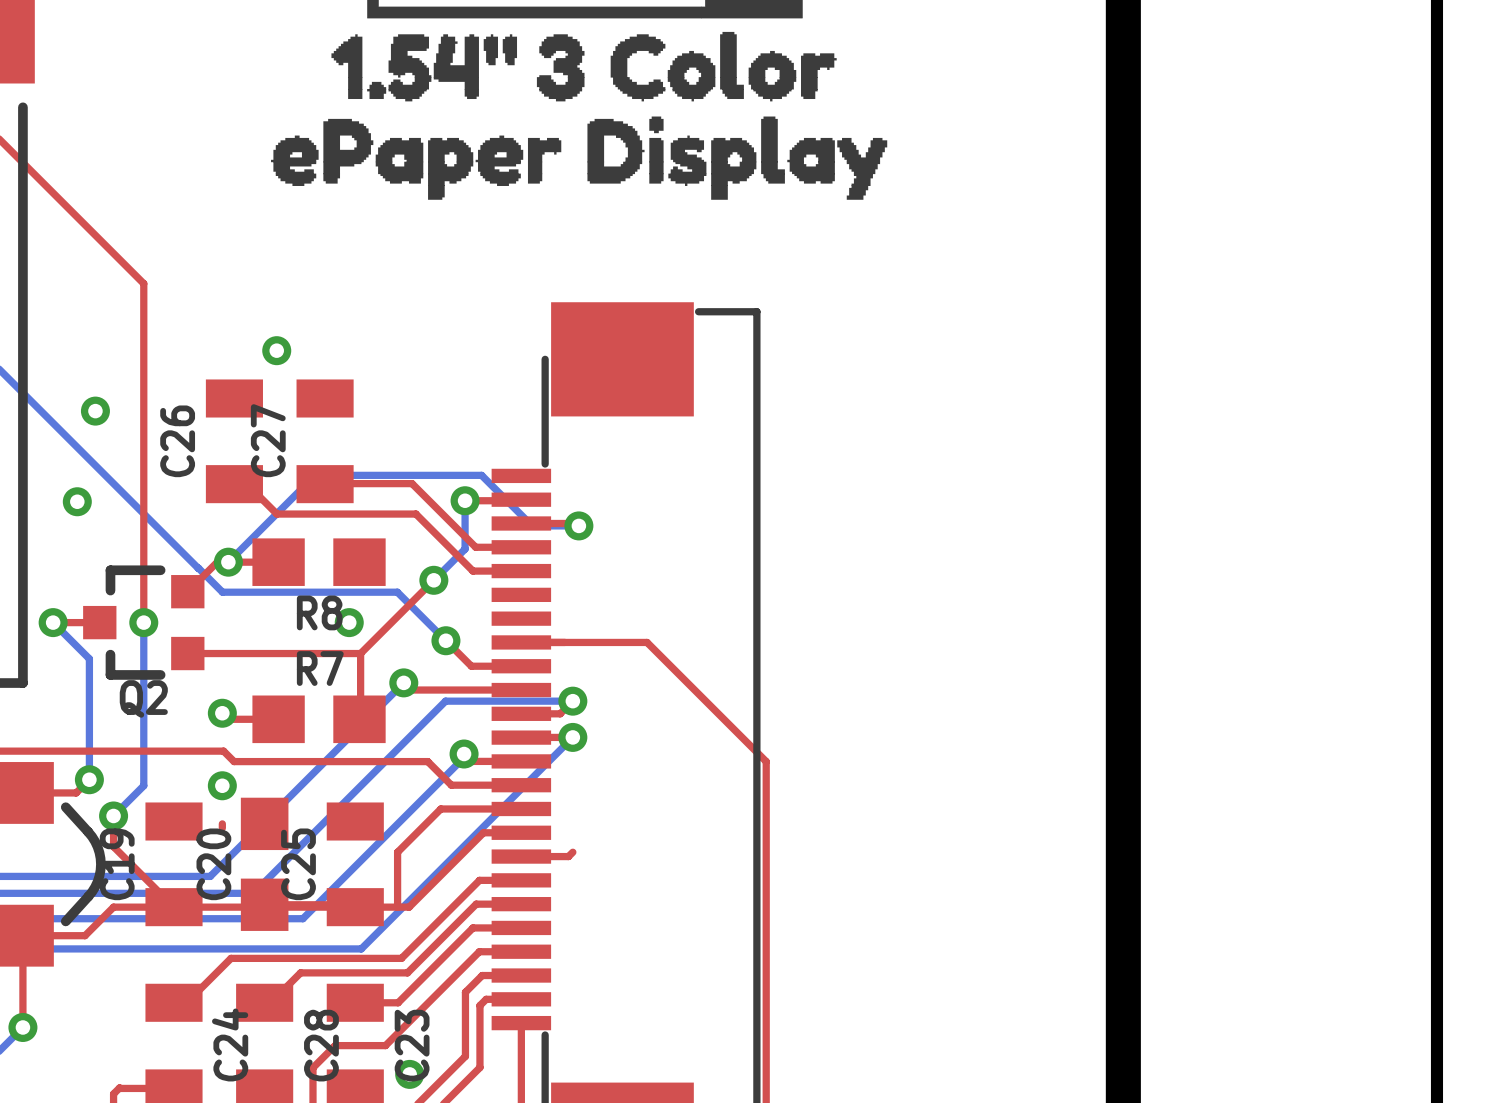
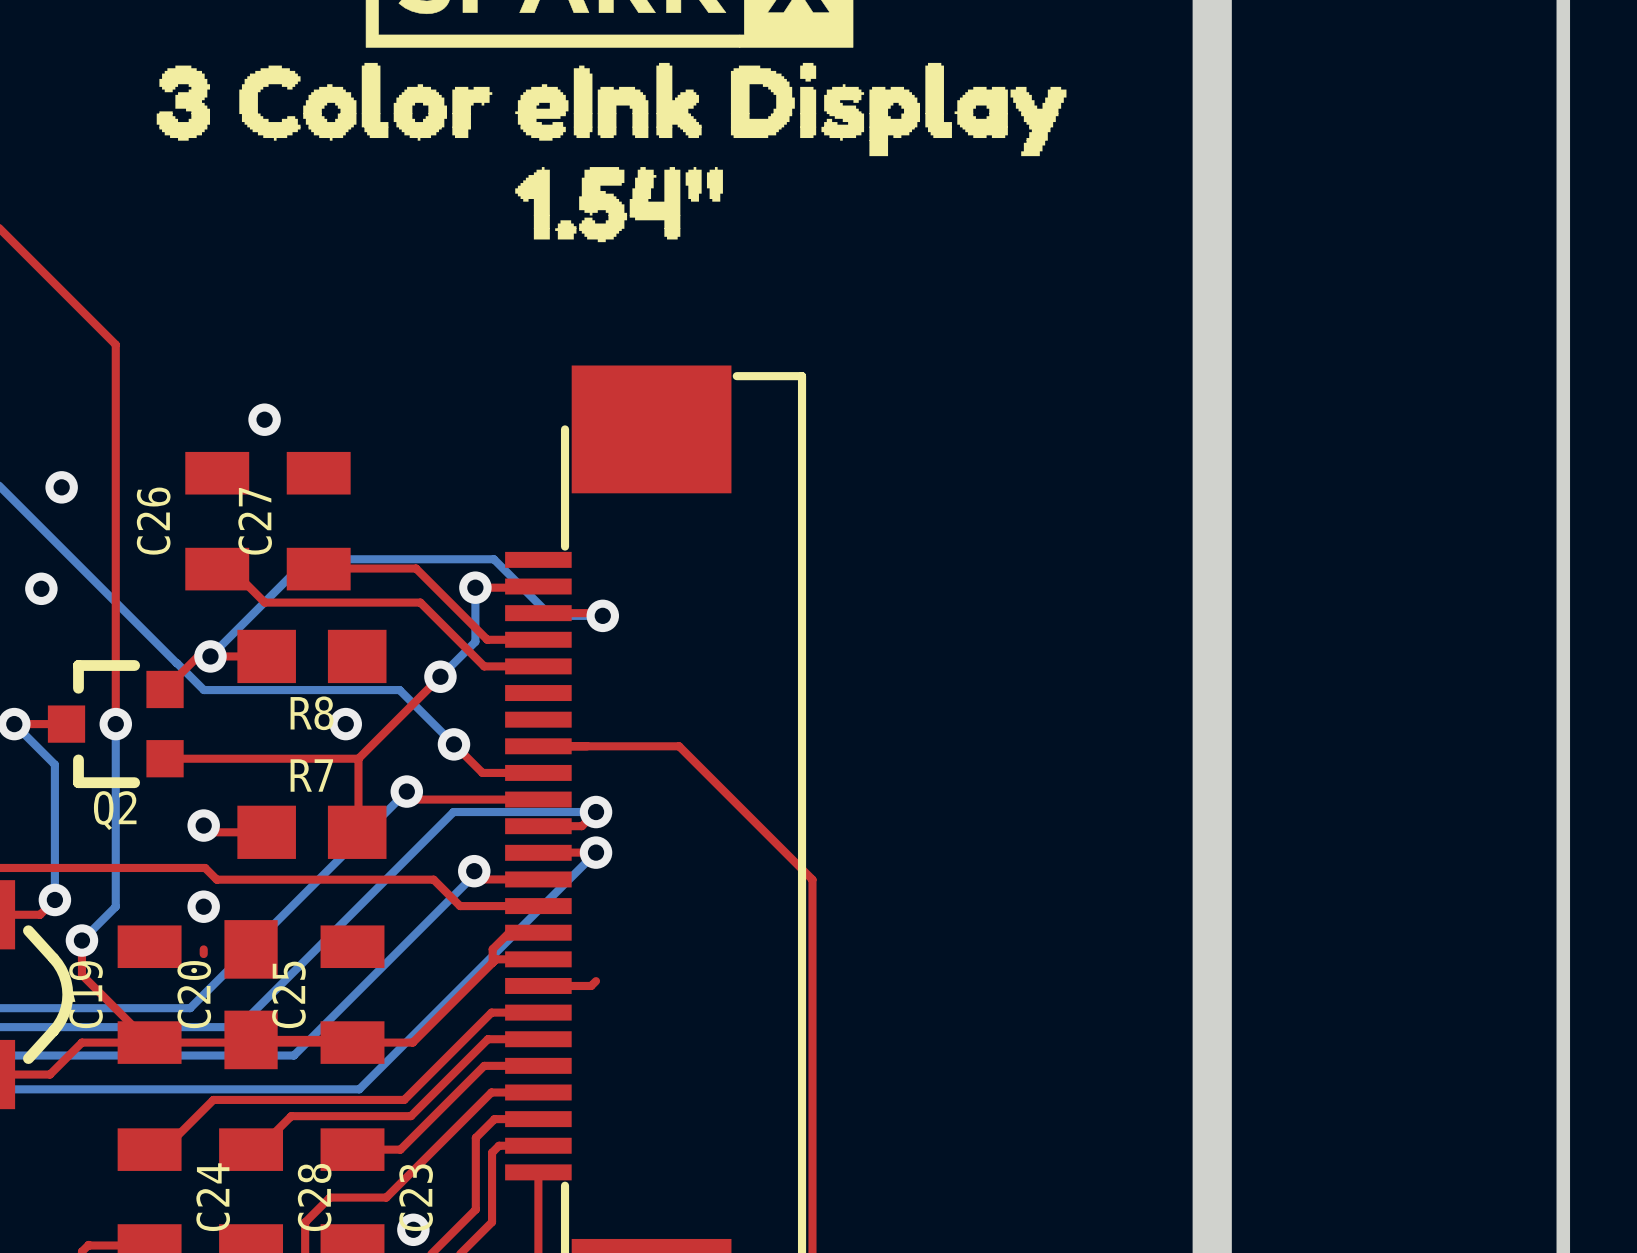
drawing: none -> [515, 62, 1067, 157]
drawing position: (686, 66) -> (324, 101)
drawing position: (424, 67) -> (619, 204)
drawing: [271, 116, 888, 200] -> none
top track: (495, 808) (440, 808) (397, 852) (397, 907) -> (509, 932) (492, 949) (492, 962)

